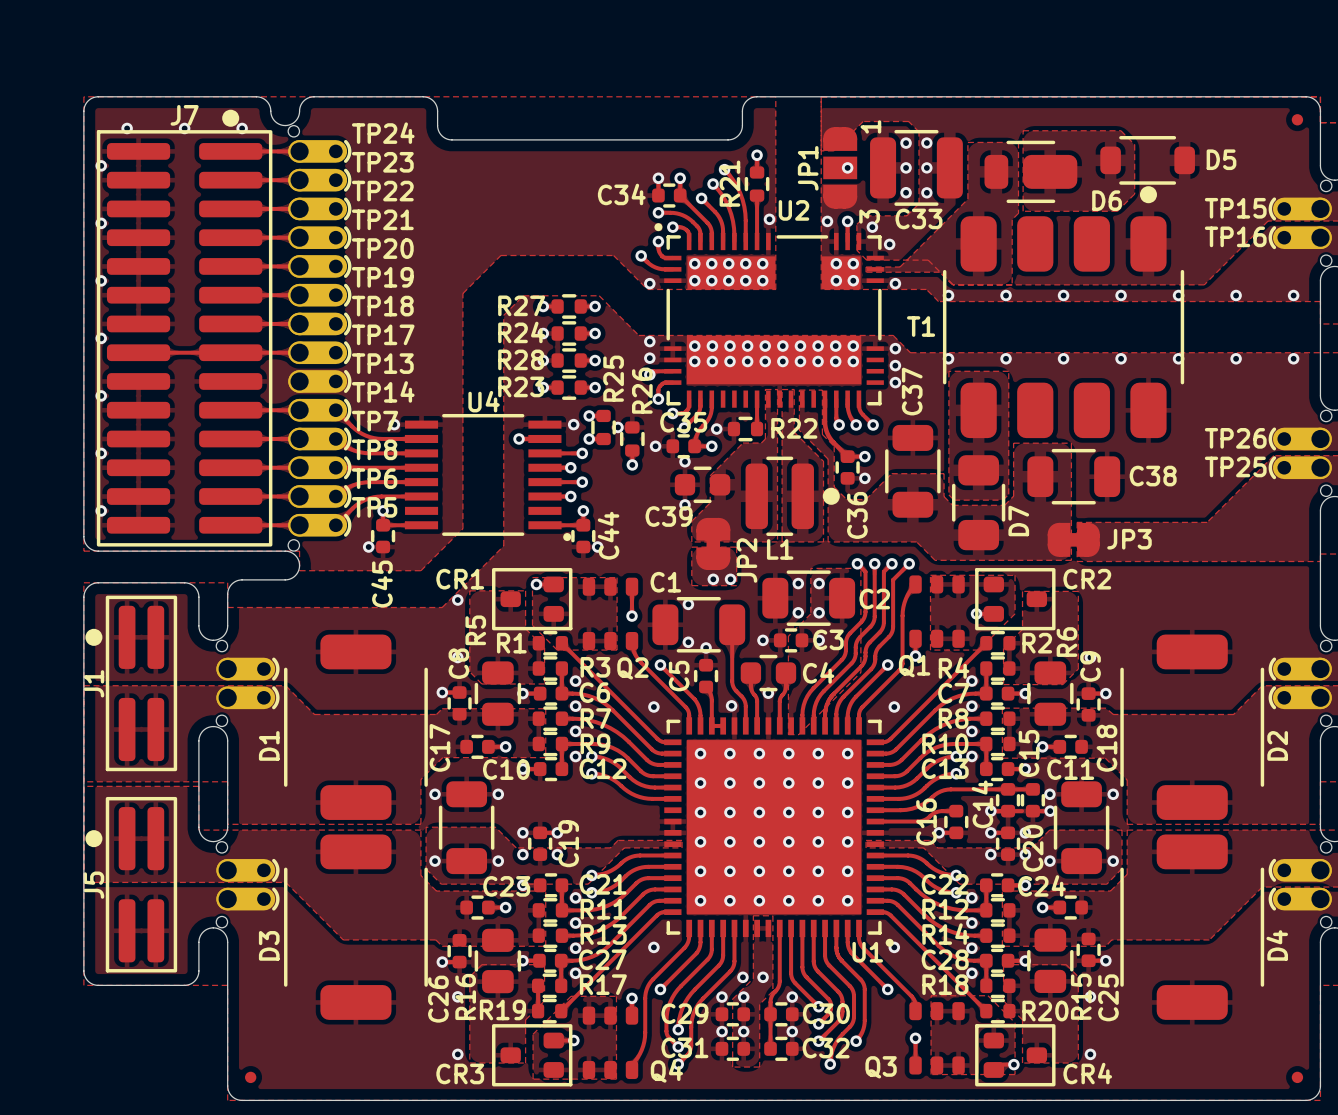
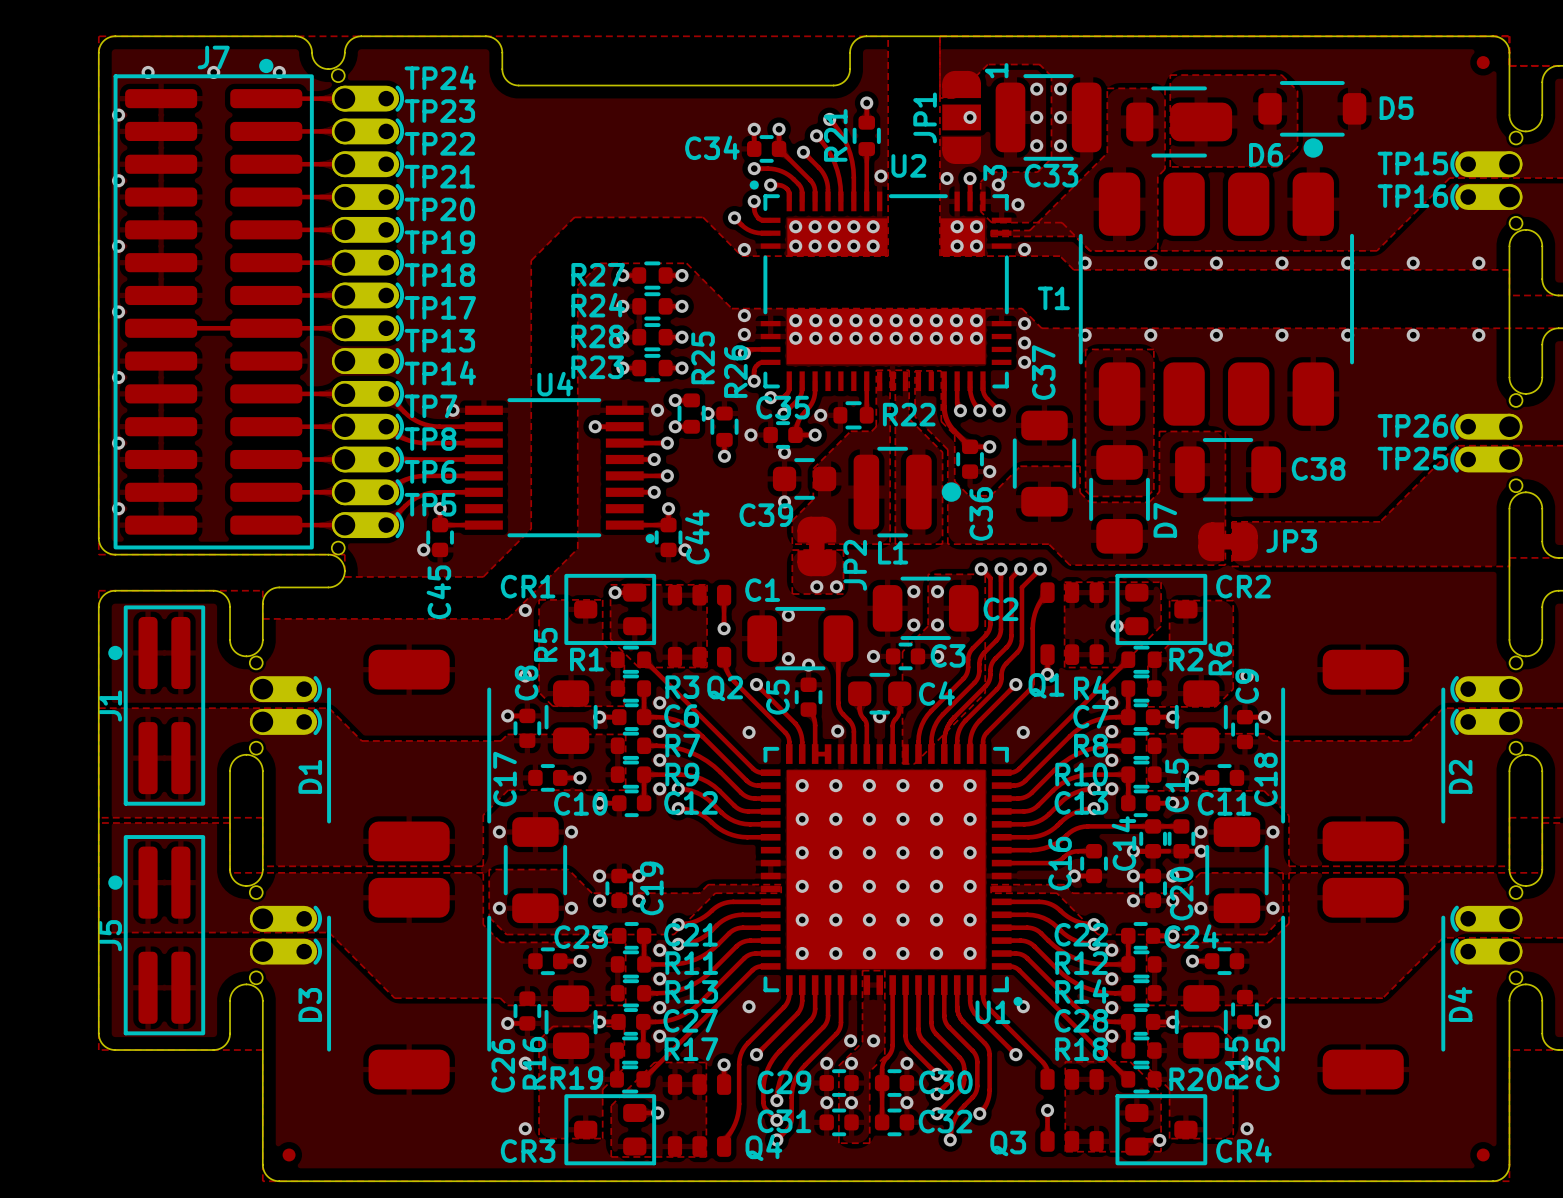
J7 footprint: [96, 109, 273, 547] -> [113, 58, 314, 550]
J1 footprint: [85, 595, 178, 772] -> [108, 605, 206, 806]
J5 footprint: [85, 796, 178, 973] -> [108, 835, 206, 1036]

